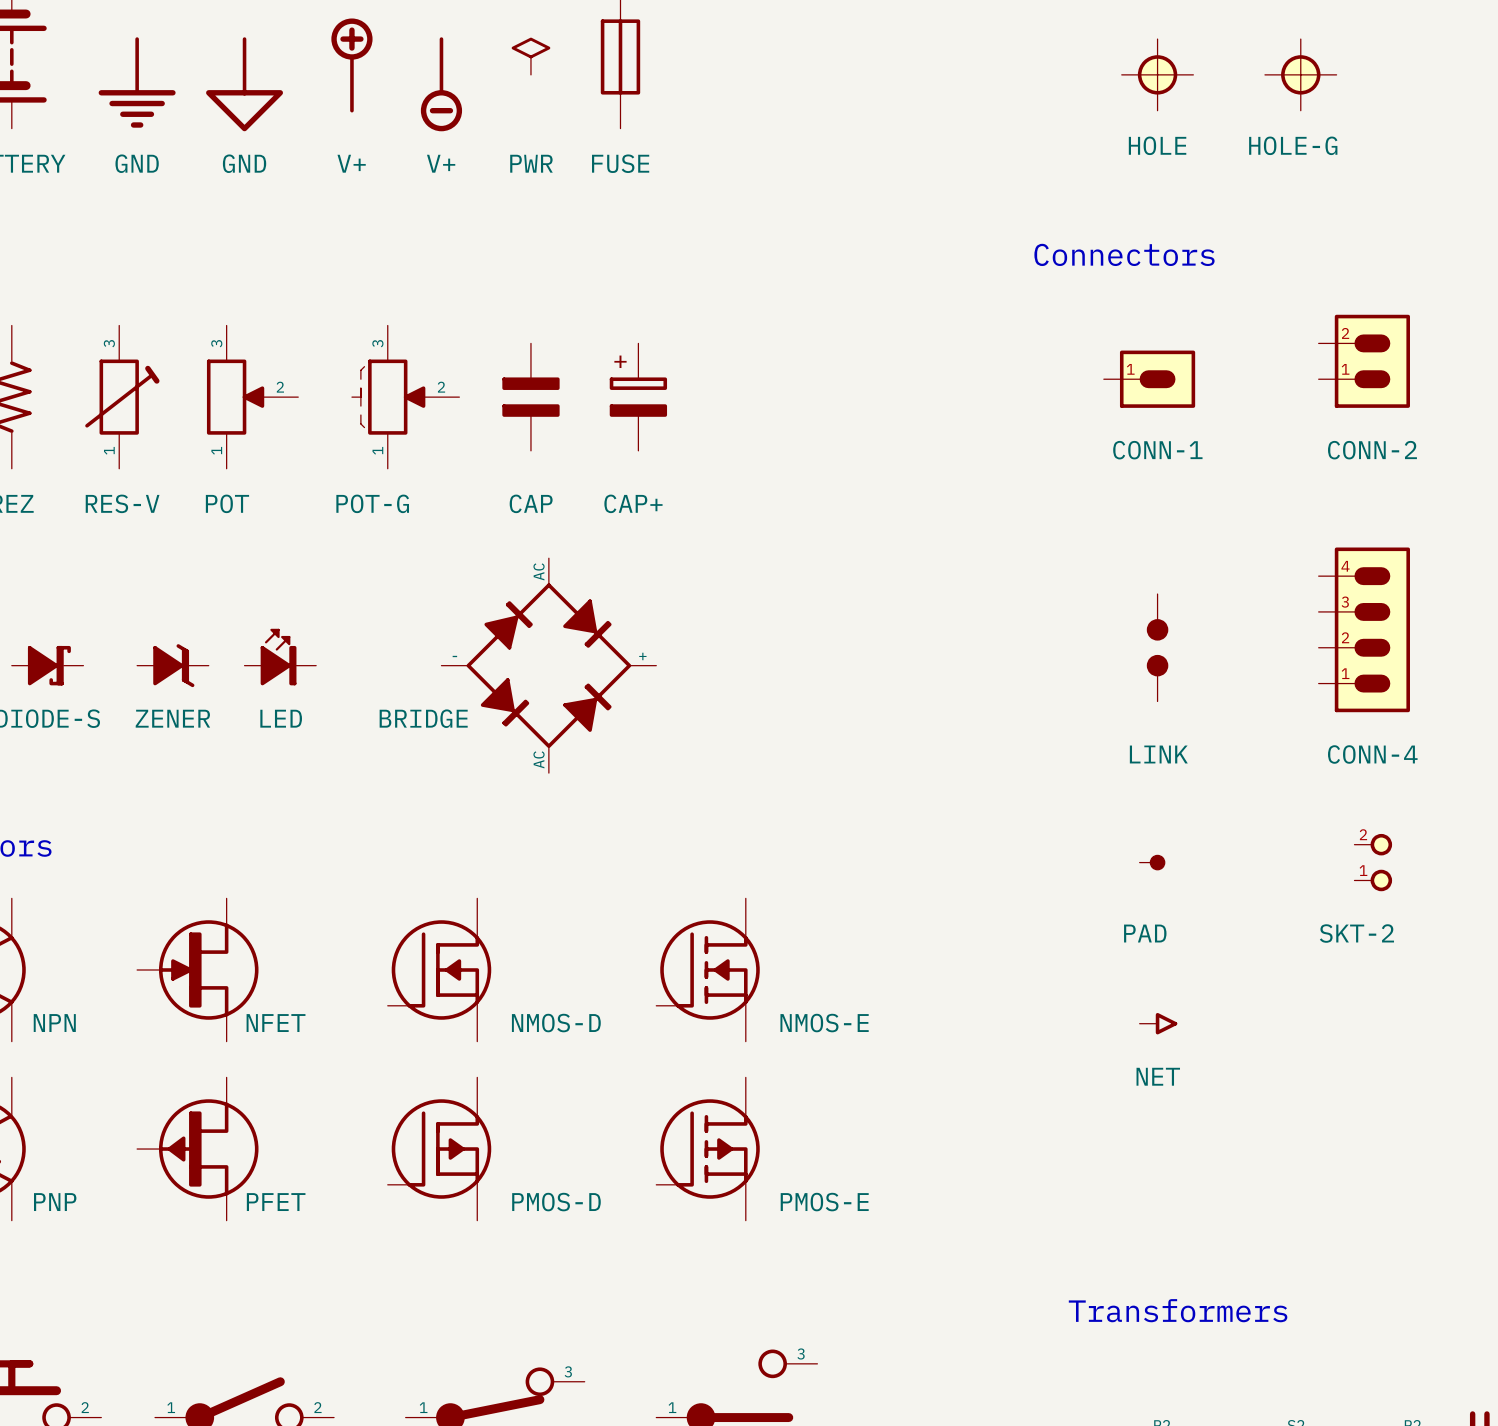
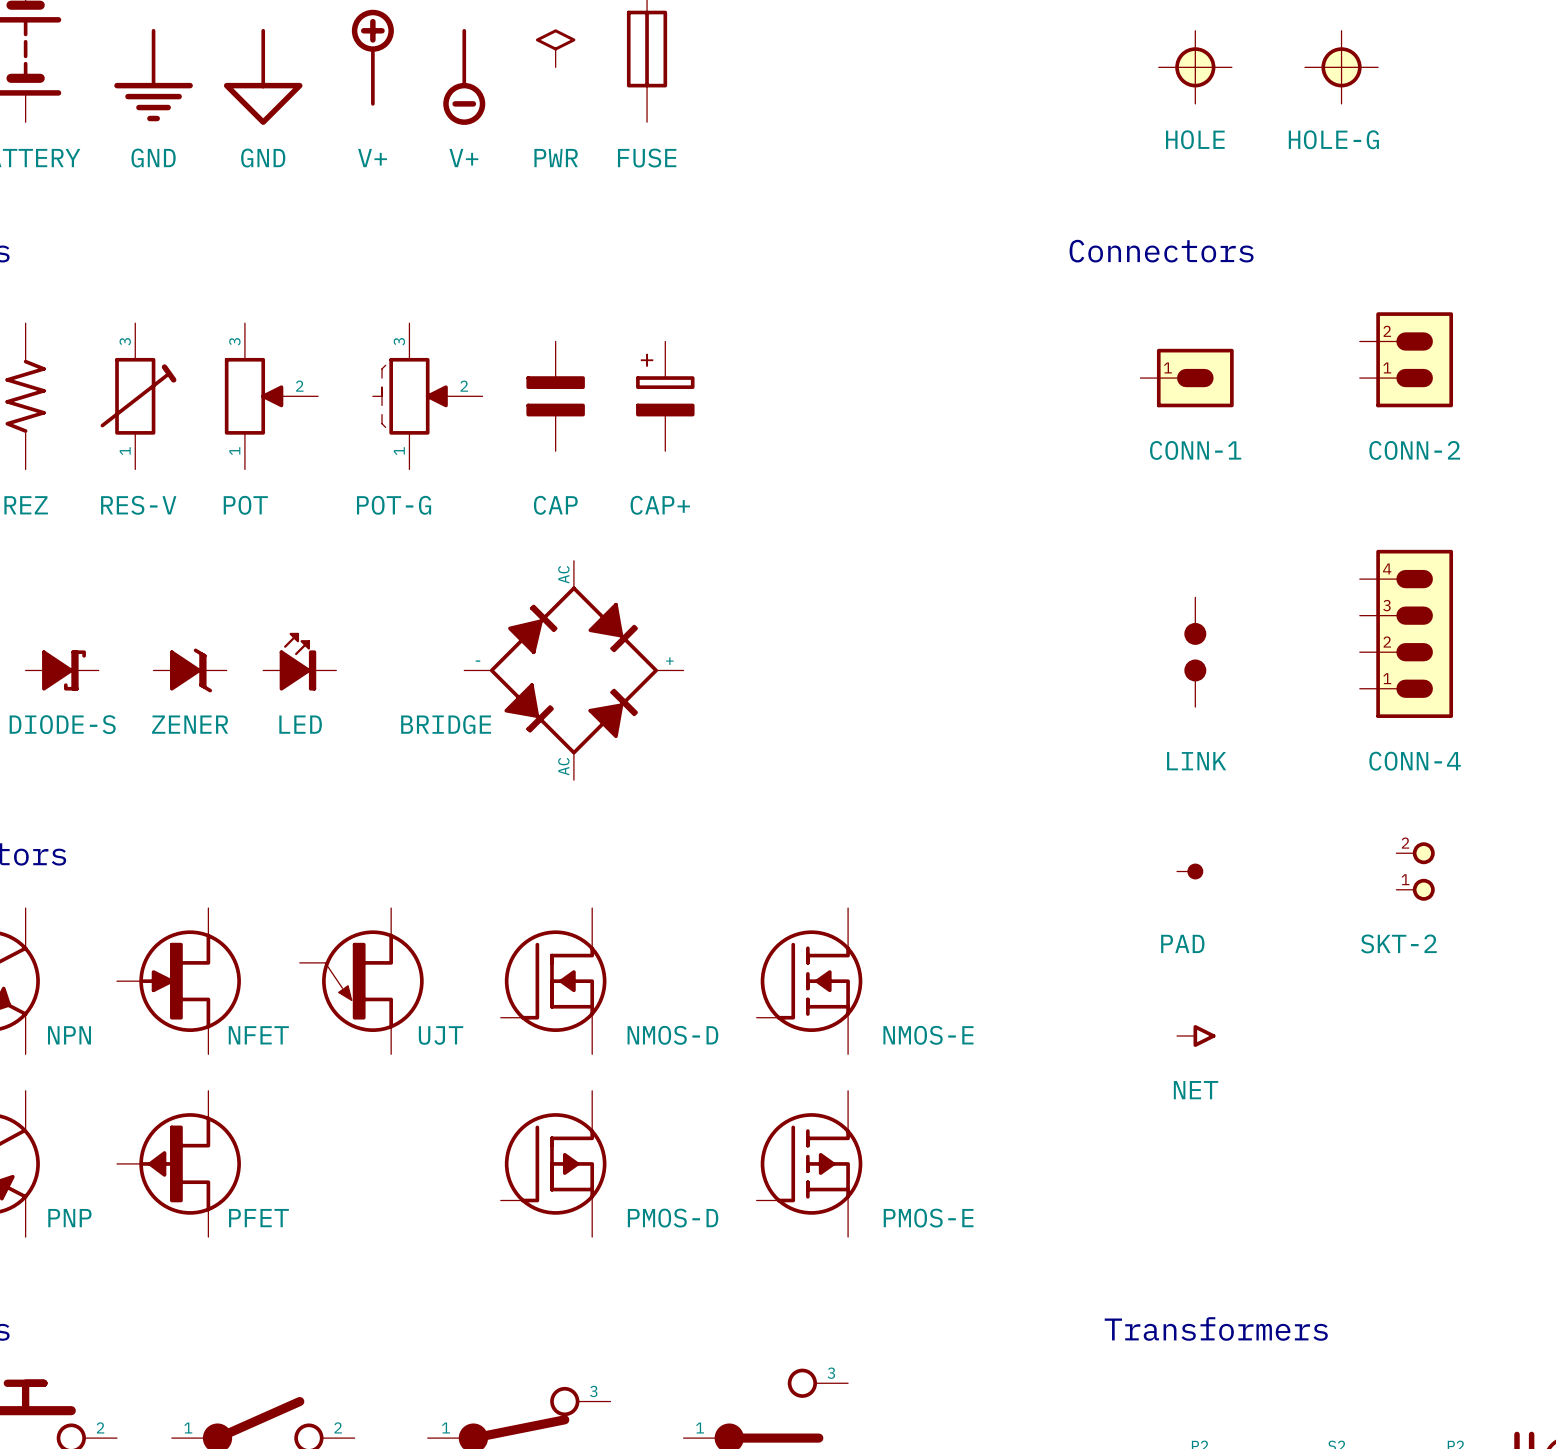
part position: (197, 969) -> (178, 981)
part: none -> UJT (361, 981)
part position: (439, 969) -> (553, 981)
part position: (708, 969) -> (809, 981)
part position: (197, 1149) -> (178, 1163)
part position: (439, 1149) -> (553, 1163)
part position: (708, 1149) -> (809, 1163)

